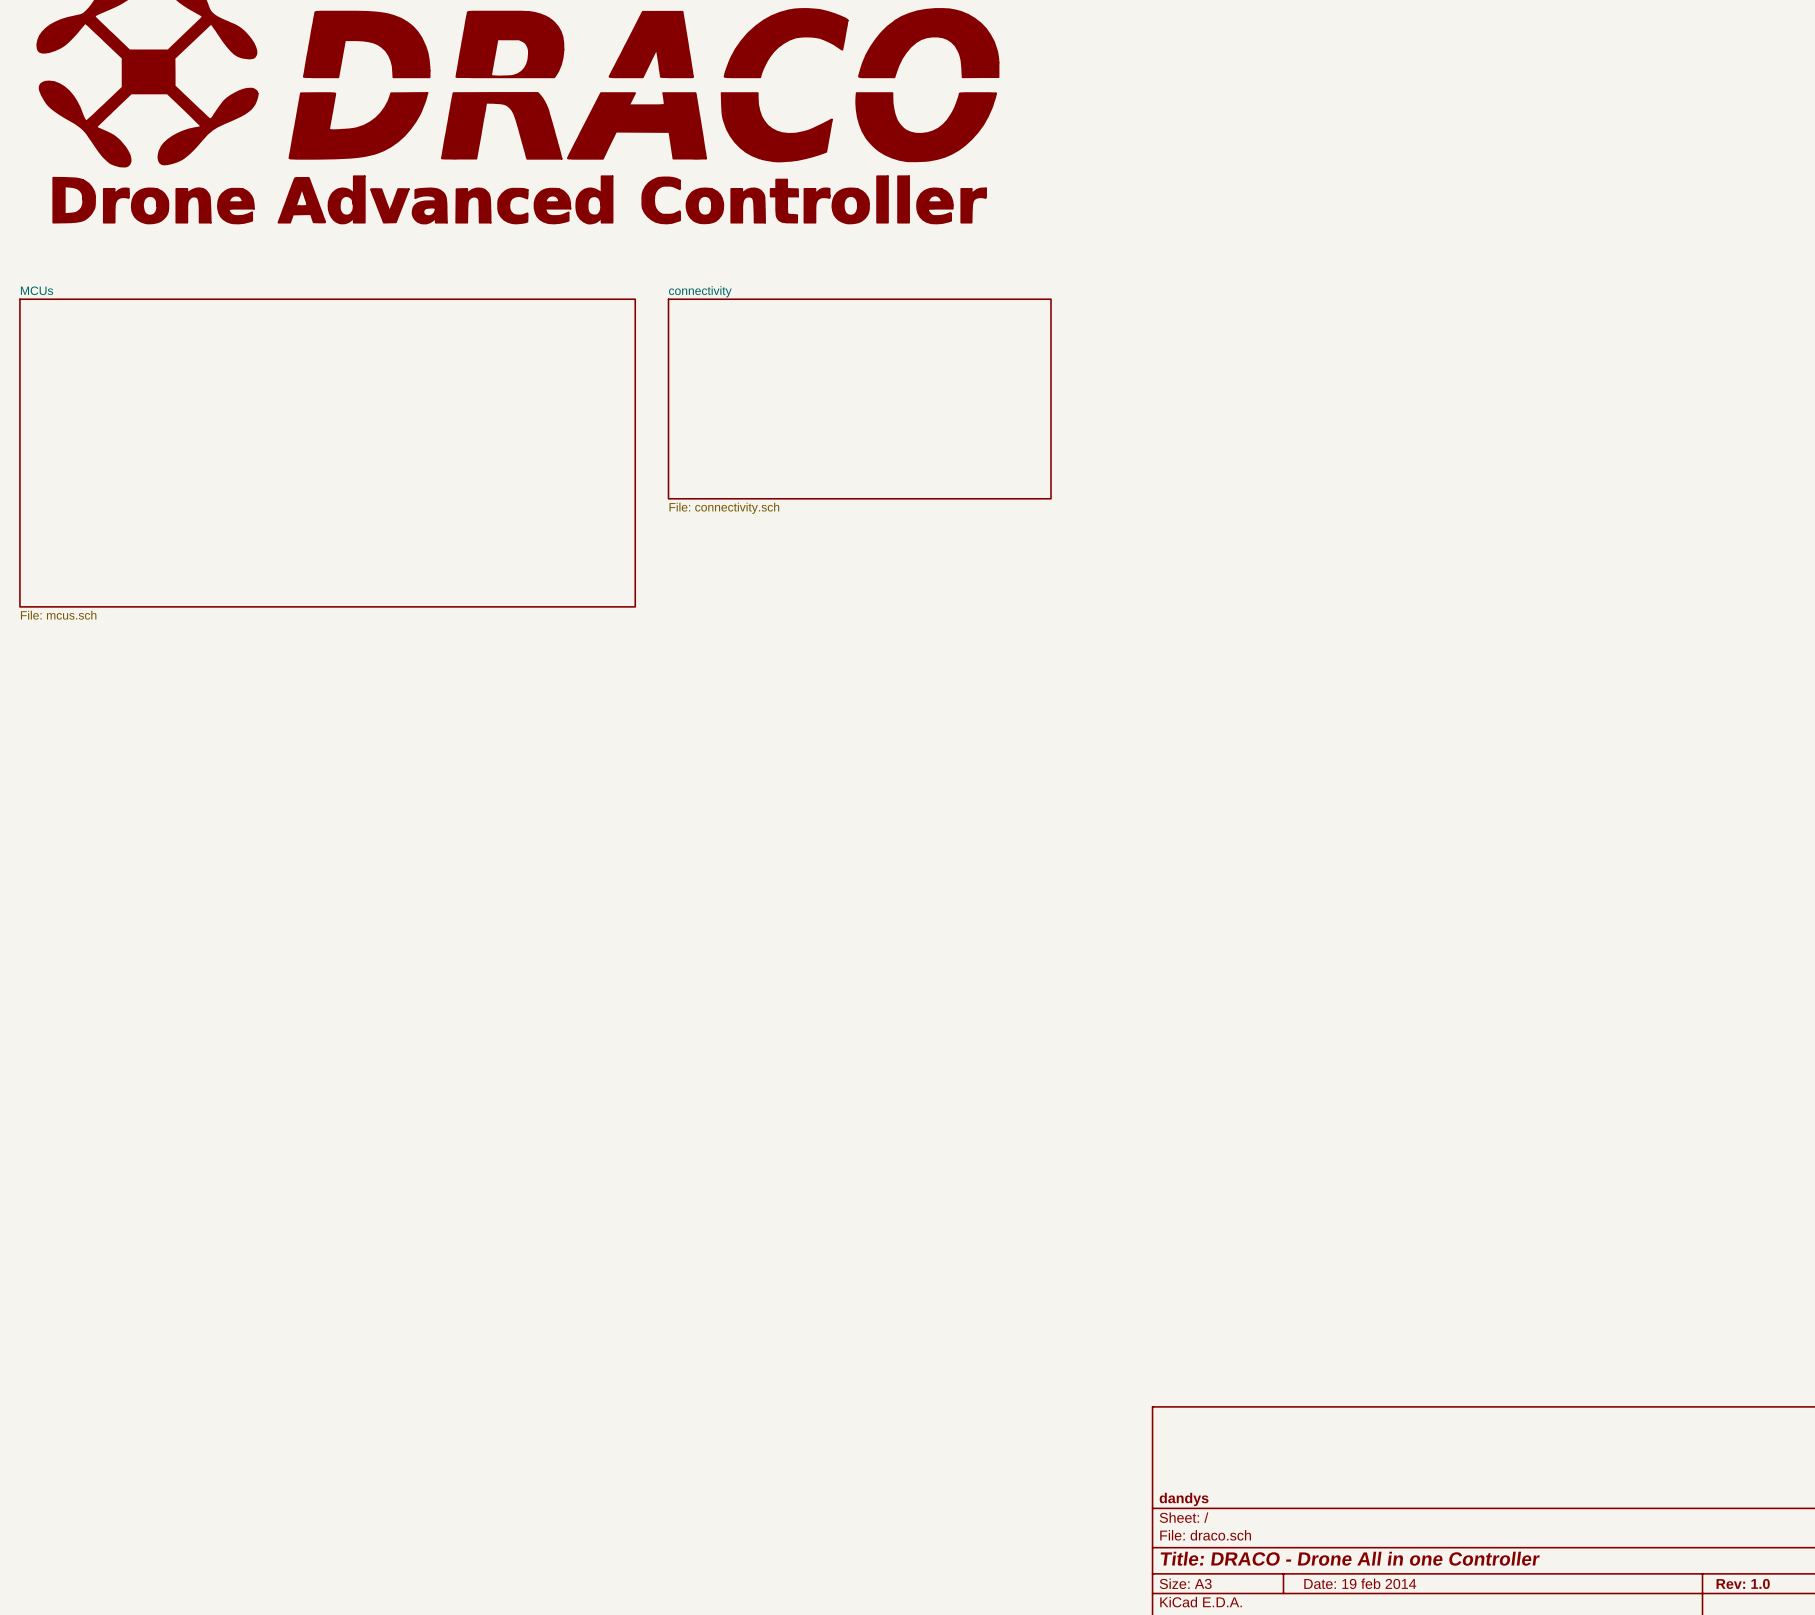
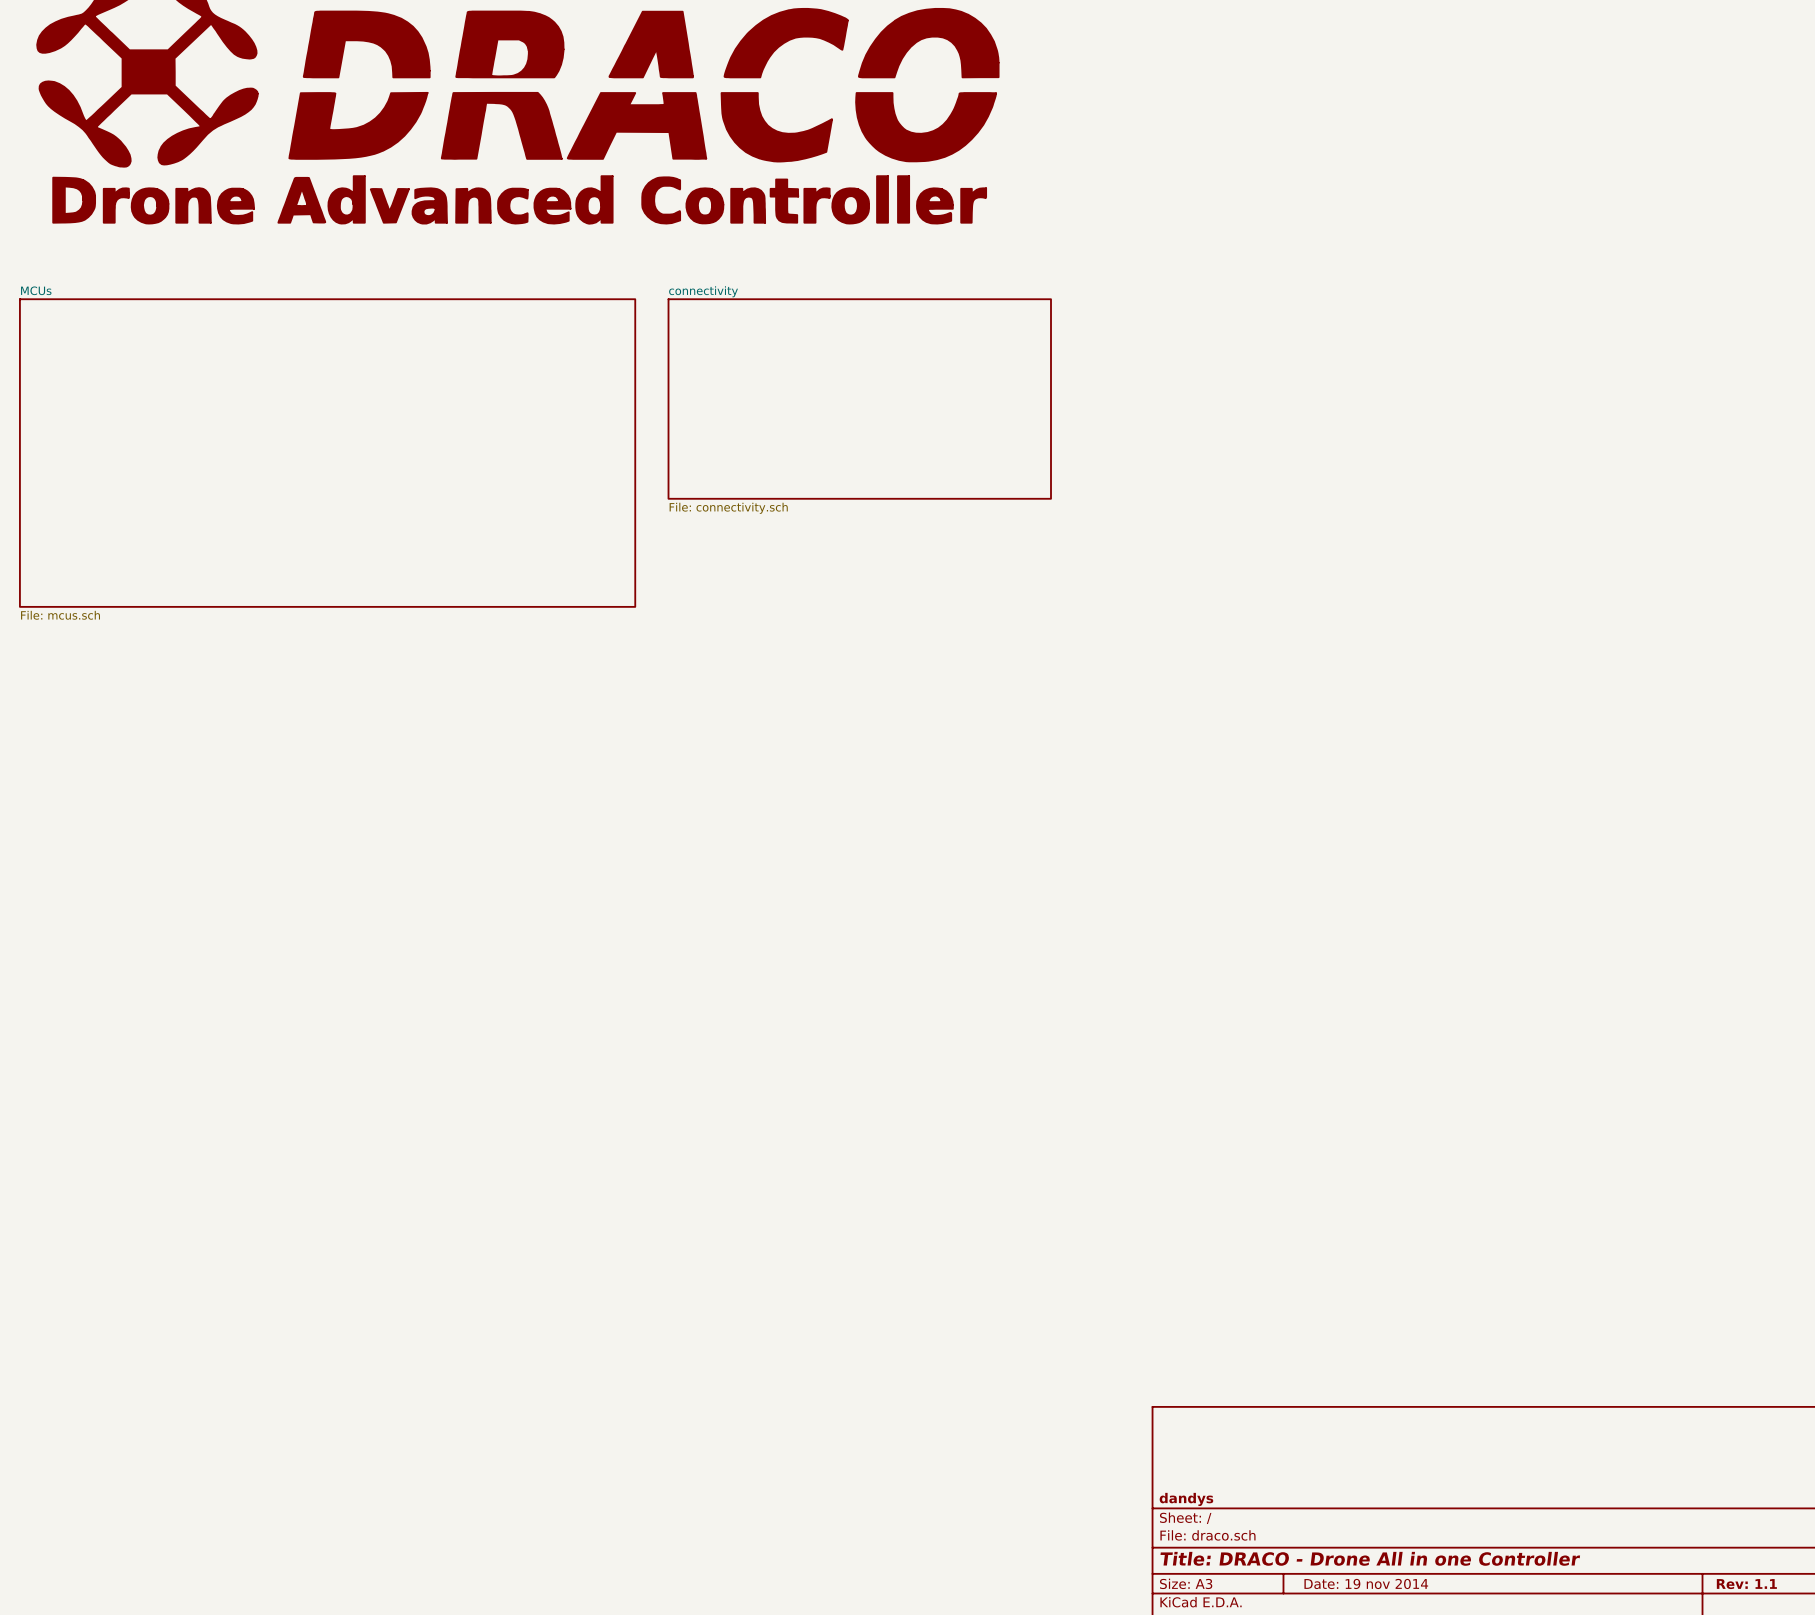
title block: Date: 19 feb 2014 (1360, 1583) -> Date: 19 nov 2014 (1366, 1583)
title block: Rev: 1.0 (1743, 1583) -> Rev: 1.1 (1746, 1584)

